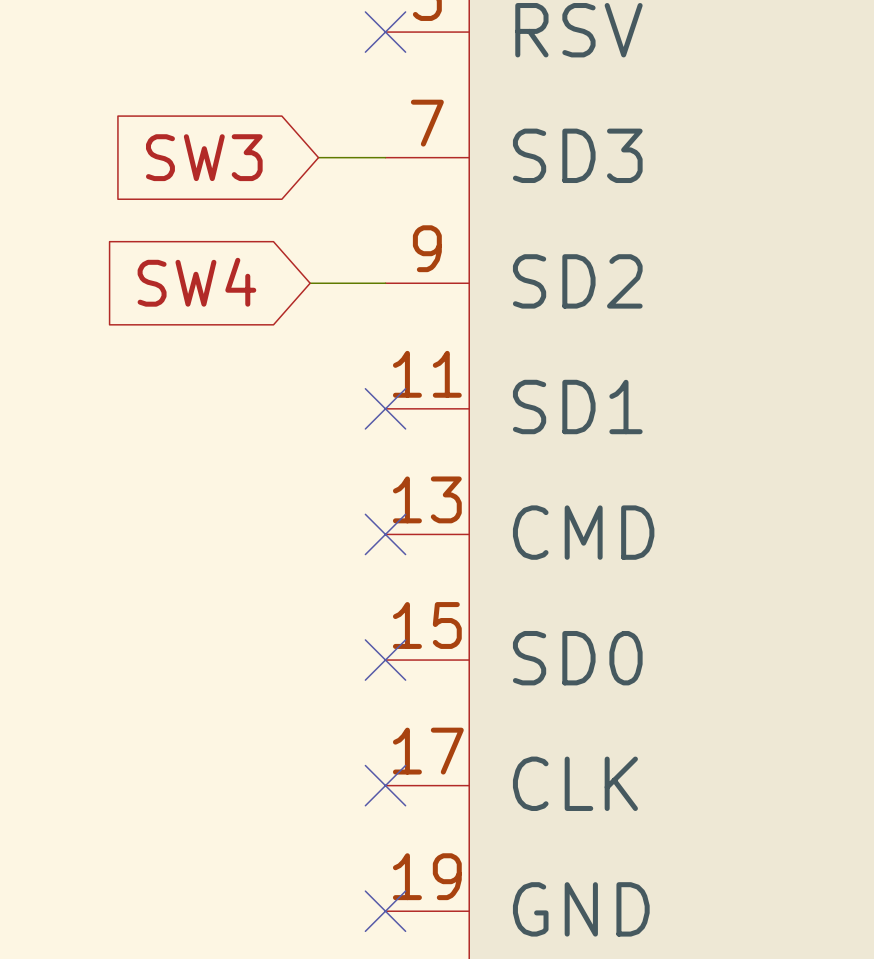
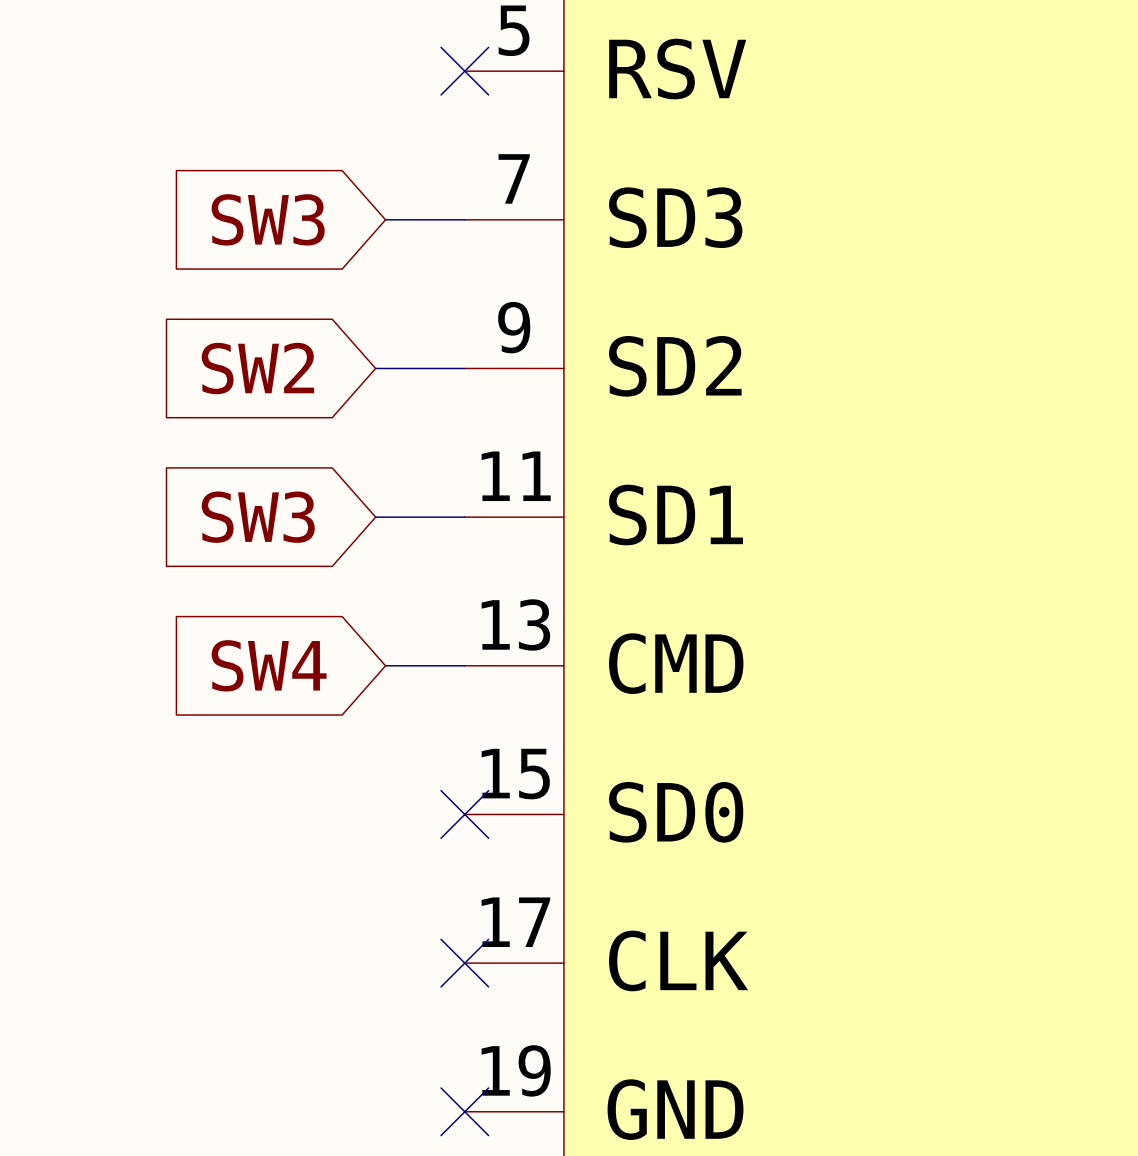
global label: SW4 (196, 282) -> SW2 (257, 368)
global label: none -> SW3 (258, 517)
wire: none -> (375, 517) (464, 517)
no-connect mark: (385, 408) -> none
global label: none -> SW4 (269, 665)
wire: none -> (385, 665) (464, 665)
no-connect mark: (385, 534) -> none

